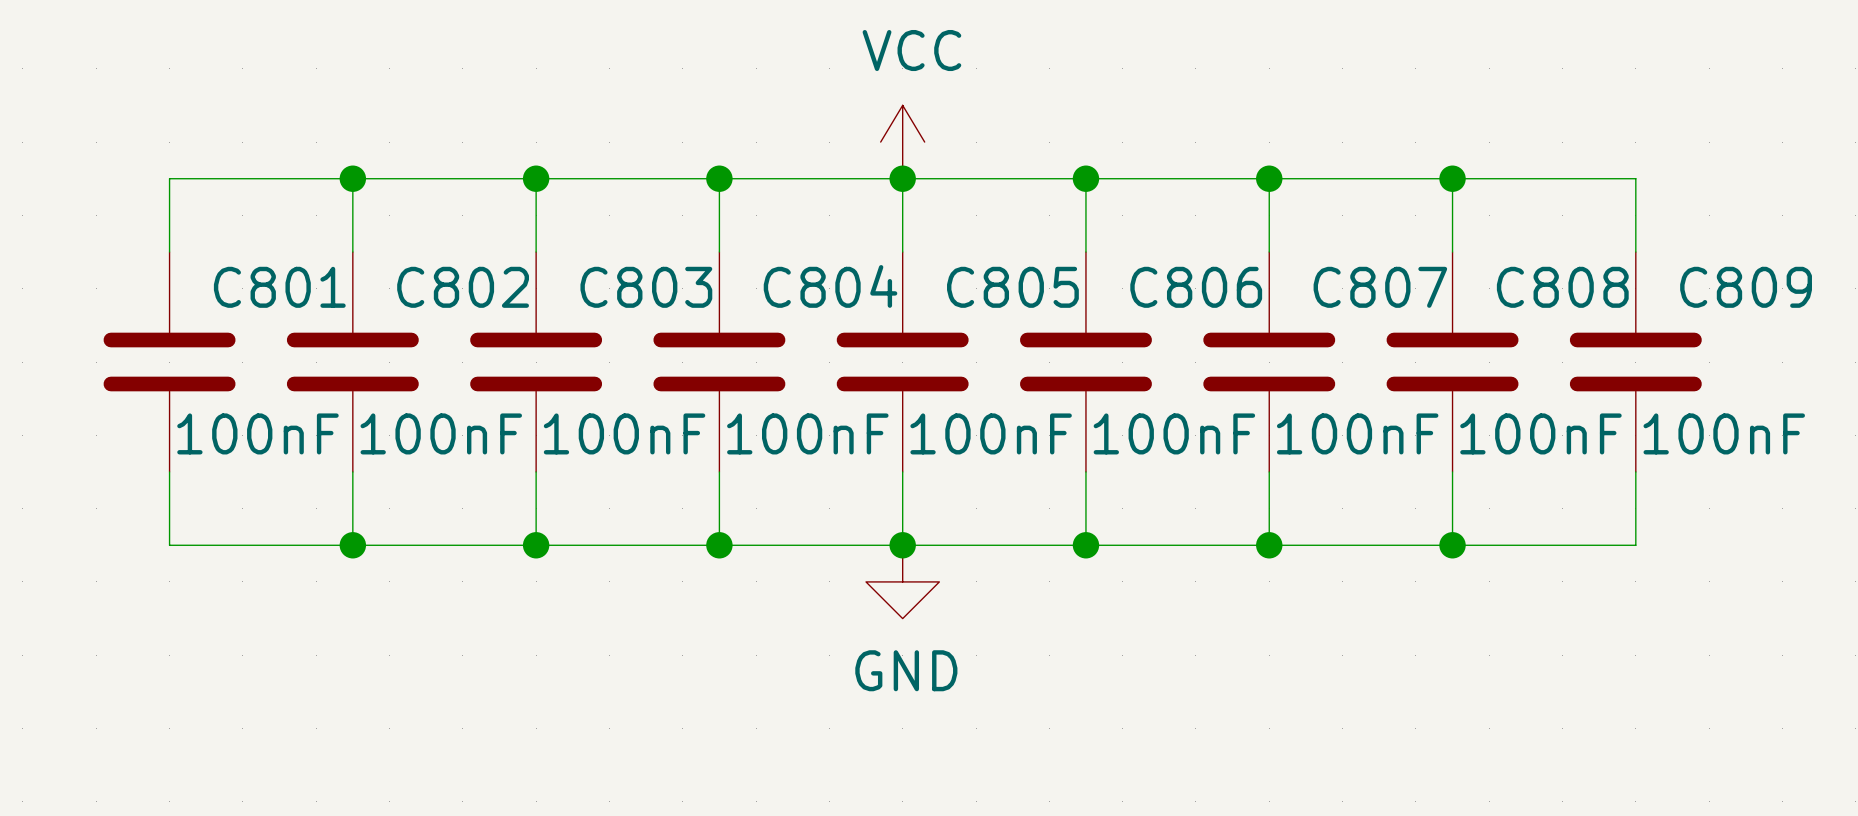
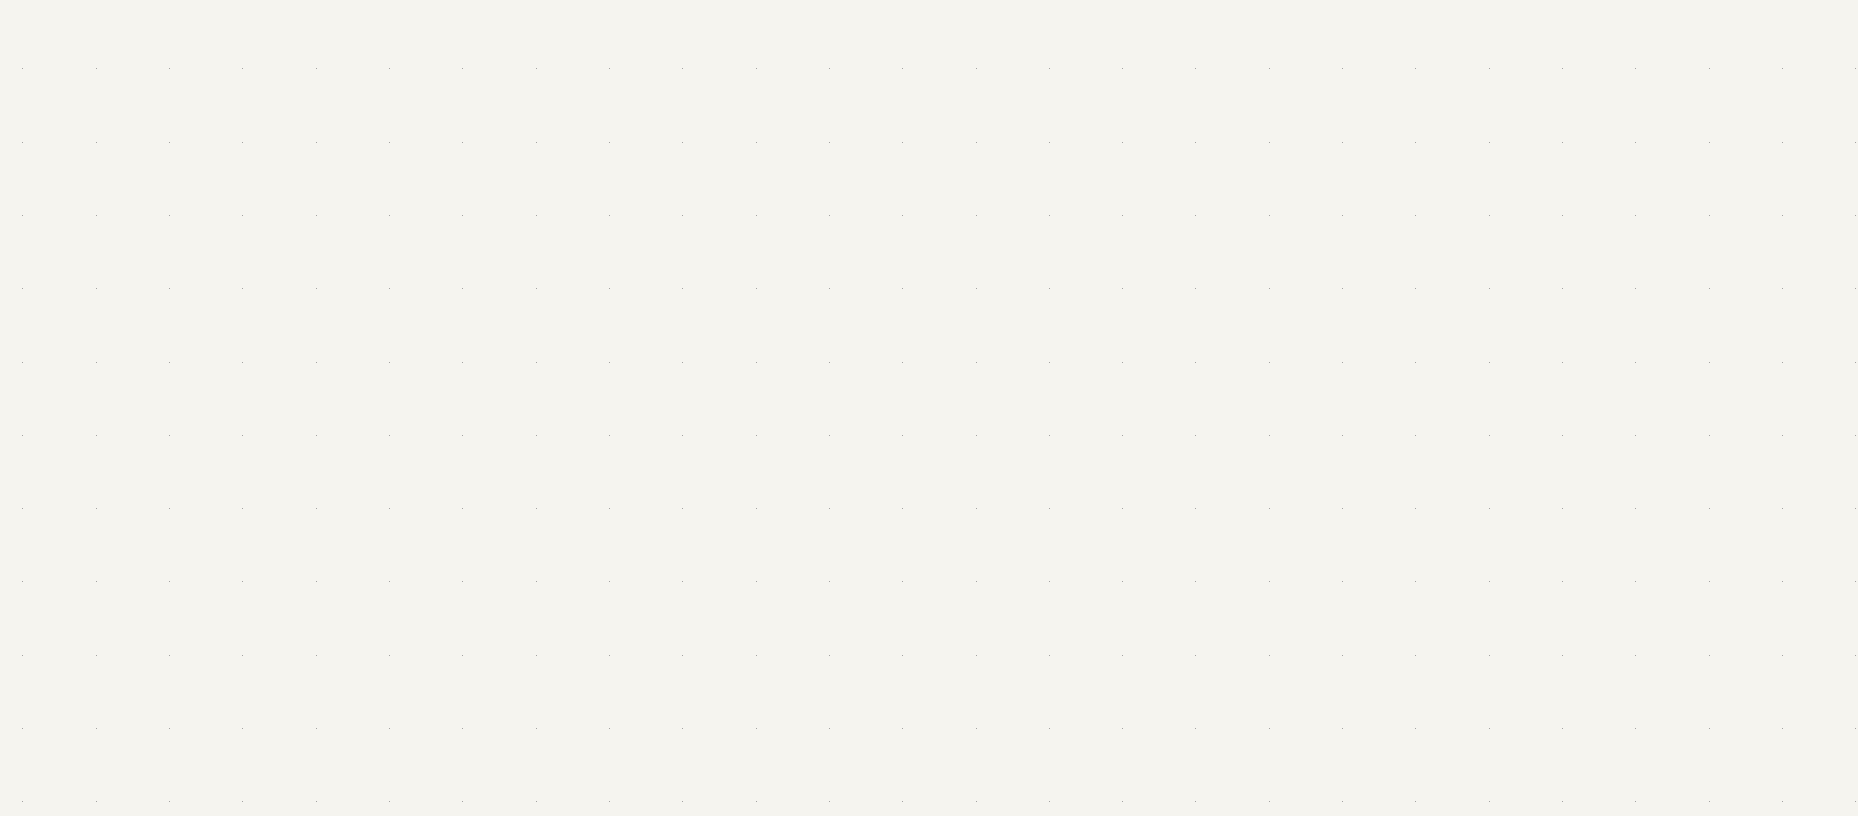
power symbol: VCC (902, 142) -> none
wire: (352, 178) (352, 252) -> none
junction: (352, 178) -> none
wire: (536, 178) (536, 252) -> none
junction: (536, 178) -> none
wire: (719, 178) (719, 252) -> none
junction: (719, 178) -> none
wire: (902, 178) (902, 252) -> none
junction: (902, 178) -> none
wire: (1085, 178) (1085, 252) -> none
junction: (1085, 178) -> none
wire: (1269, 178) (1269, 252) -> none
junction: (1269, 178) -> none
wire: (1452, 178) (1452, 252) -> none
junction: (1452, 178) -> none
wire: (169, 252) (169, 178) (1635, 178) (1635, 252) -> none
C801: 100nF (169, 362) -> none
C802: 100nF (352, 362) -> none
C803: 100nF (536, 362) -> none
C804: 100nF (719, 362) -> none
C805: 100nF (902, 362) -> none
C806: 100nF (1085, 362) -> none
C807: 100nF (1269, 362) -> none
C808: 100nF (1452, 362) -> none
C809: 100nF (1635, 362) -> none
wire: (169, 471) (169, 545) (1635, 545) (1635, 471) -> none
wire: (352, 471) (352, 545) -> none
wire: (536, 471) (536, 545) -> none
wire: (719, 471) (719, 545) -> none
wire: (902, 471) (902, 545) -> none
wire: (1085, 471) (1085, 545) -> none
wire: (1269, 471) (1269, 545) -> none
wire: (1452, 471) (1452, 545) -> none
junction: (352, 545) -> none
junction: (536, 545) -> none
junction: (719, 545) -> none
junction: (902, 545) -> none
junction: (1085, 545) -> none
junction: (1269, 545) -> none
junction: (1452, 545) -> none
power symbol: GND (902, 581) -> none

